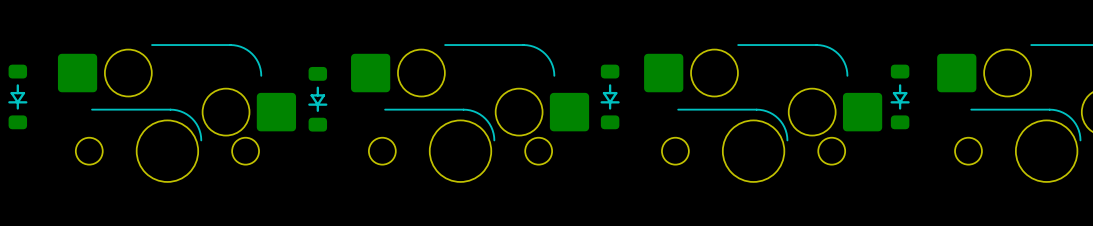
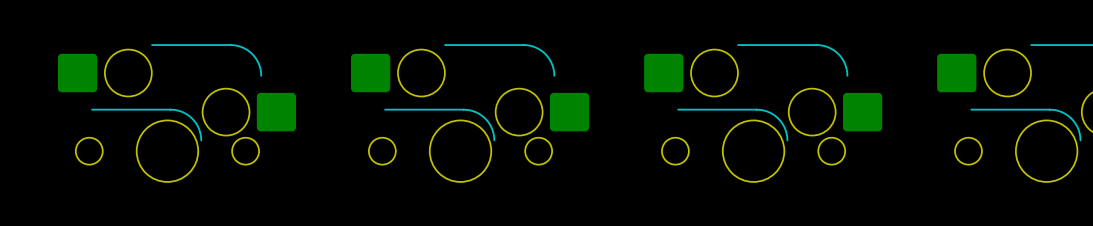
part: (17, 96) -> none
part: (610, 96) -> none
part: (900, 96) -> none
part: (317, 99) -> none

